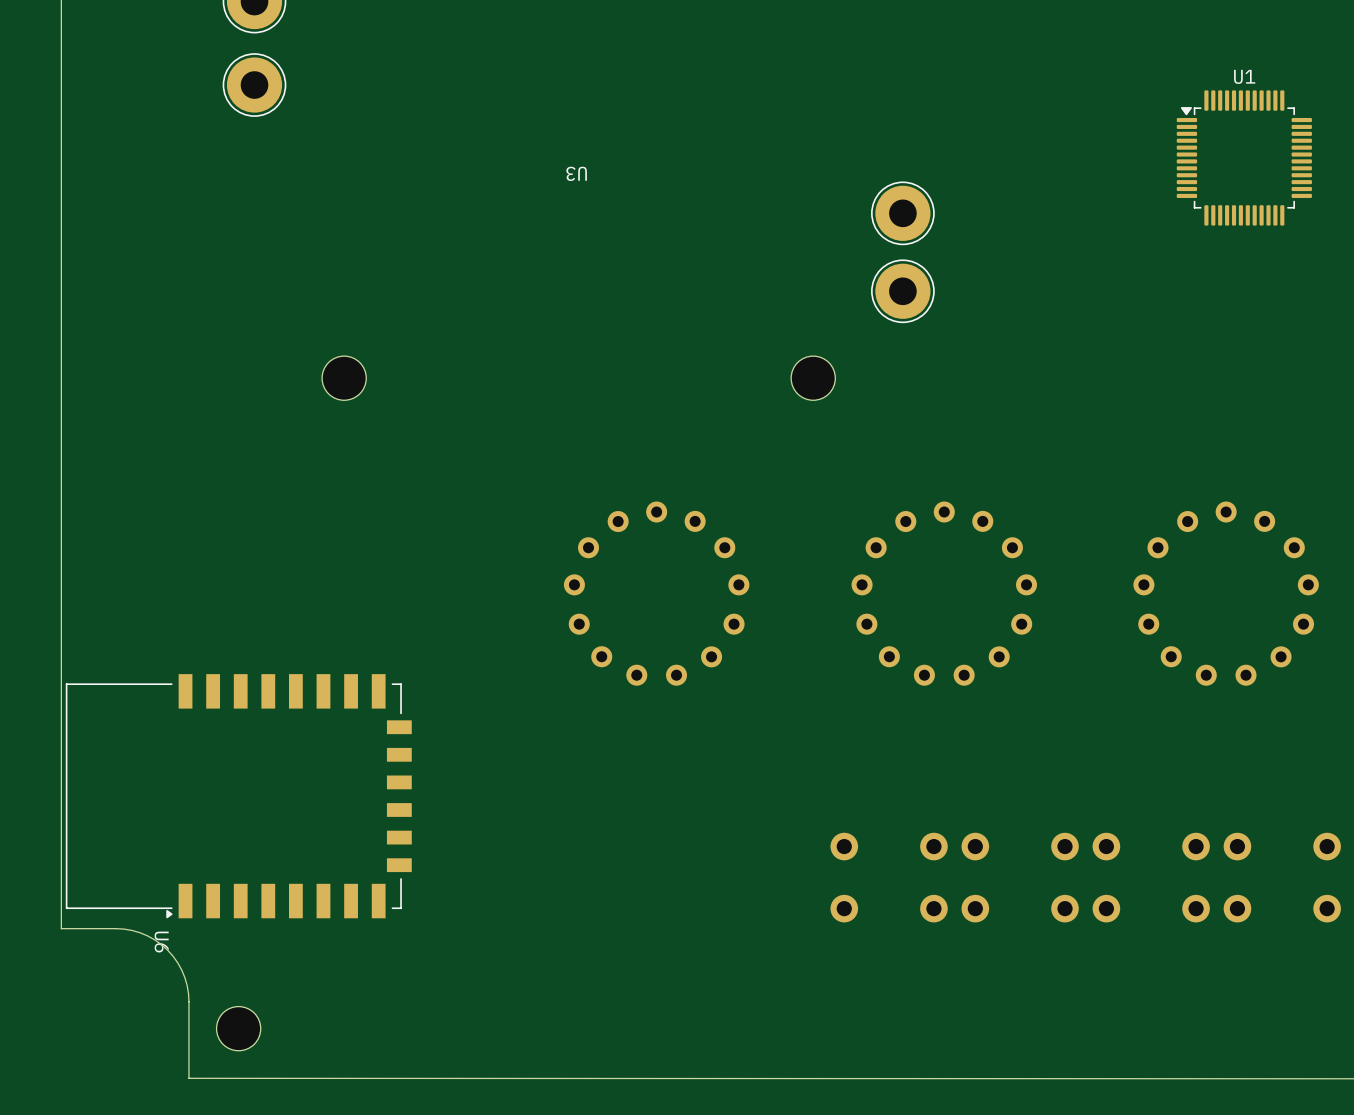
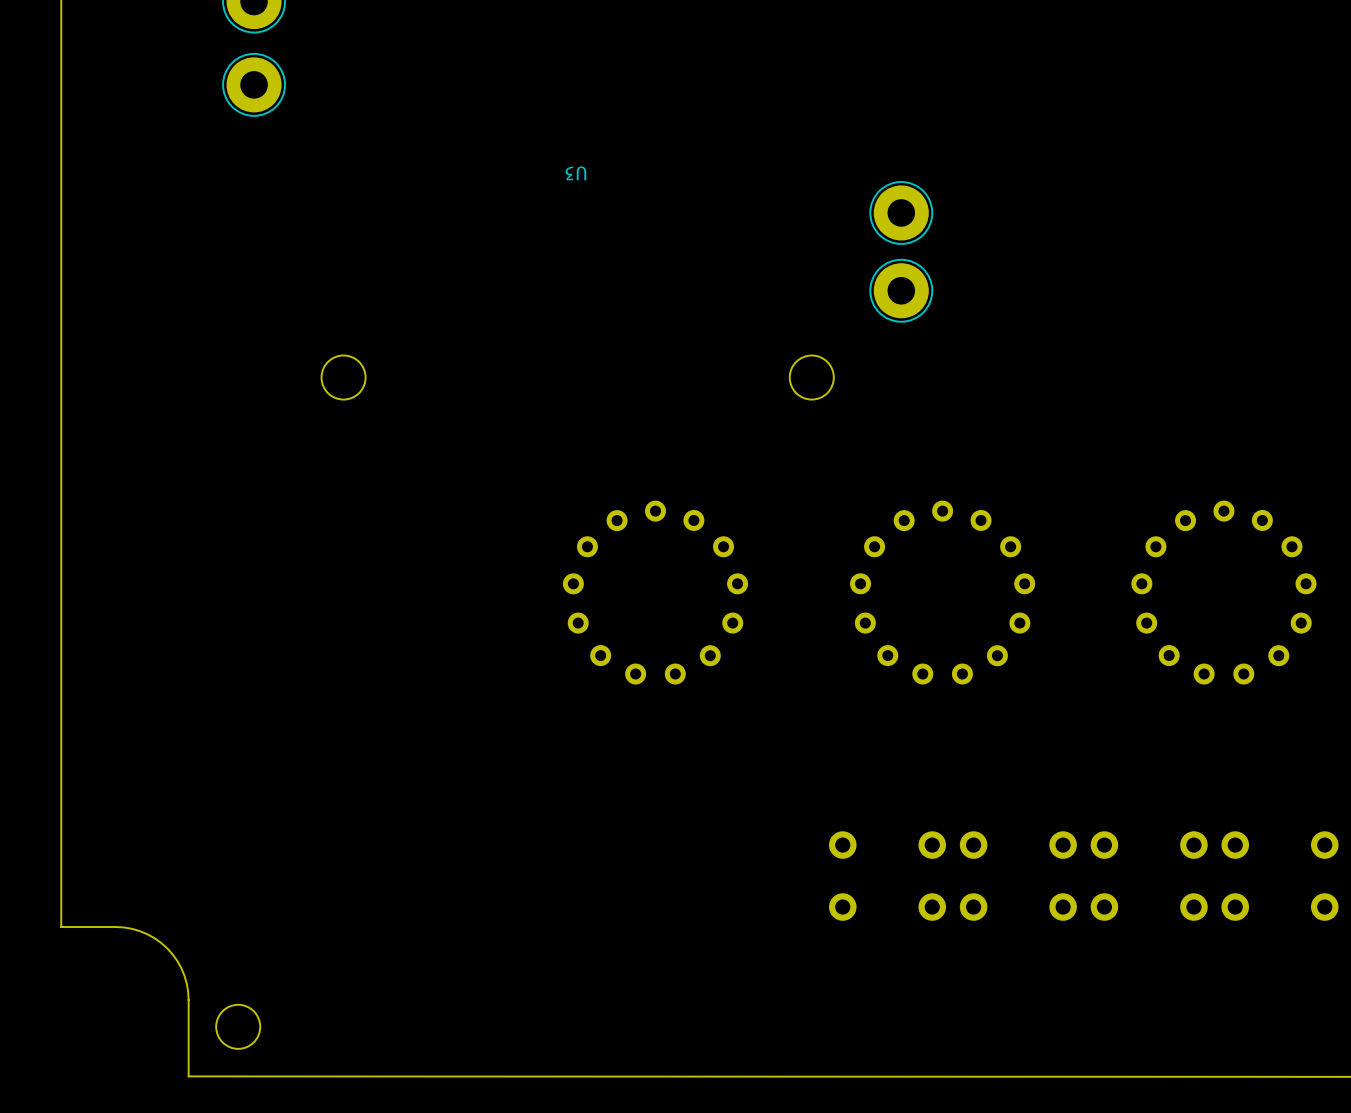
U1: (1244, 157) -> none
U6: (238, 796) -> none

